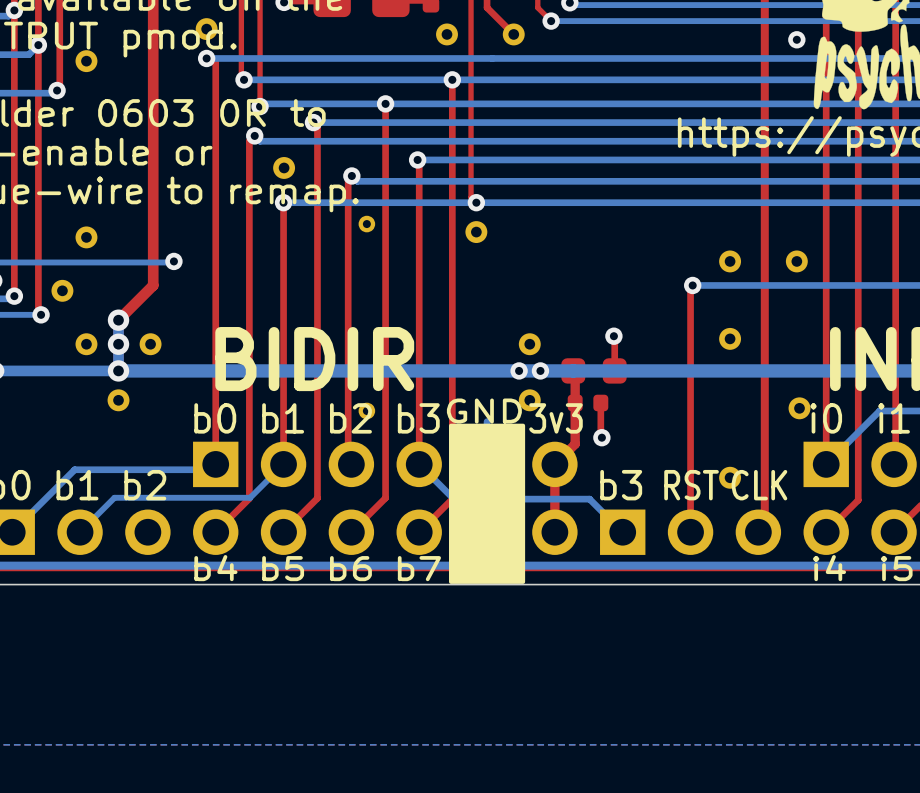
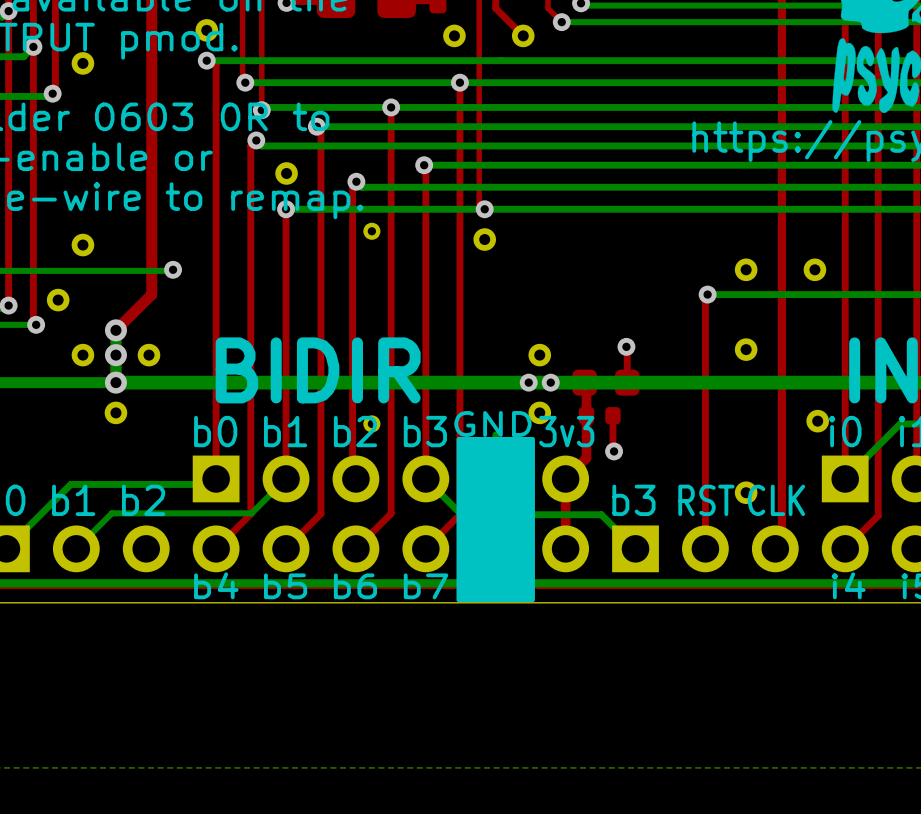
via: (796, 39) -> none

